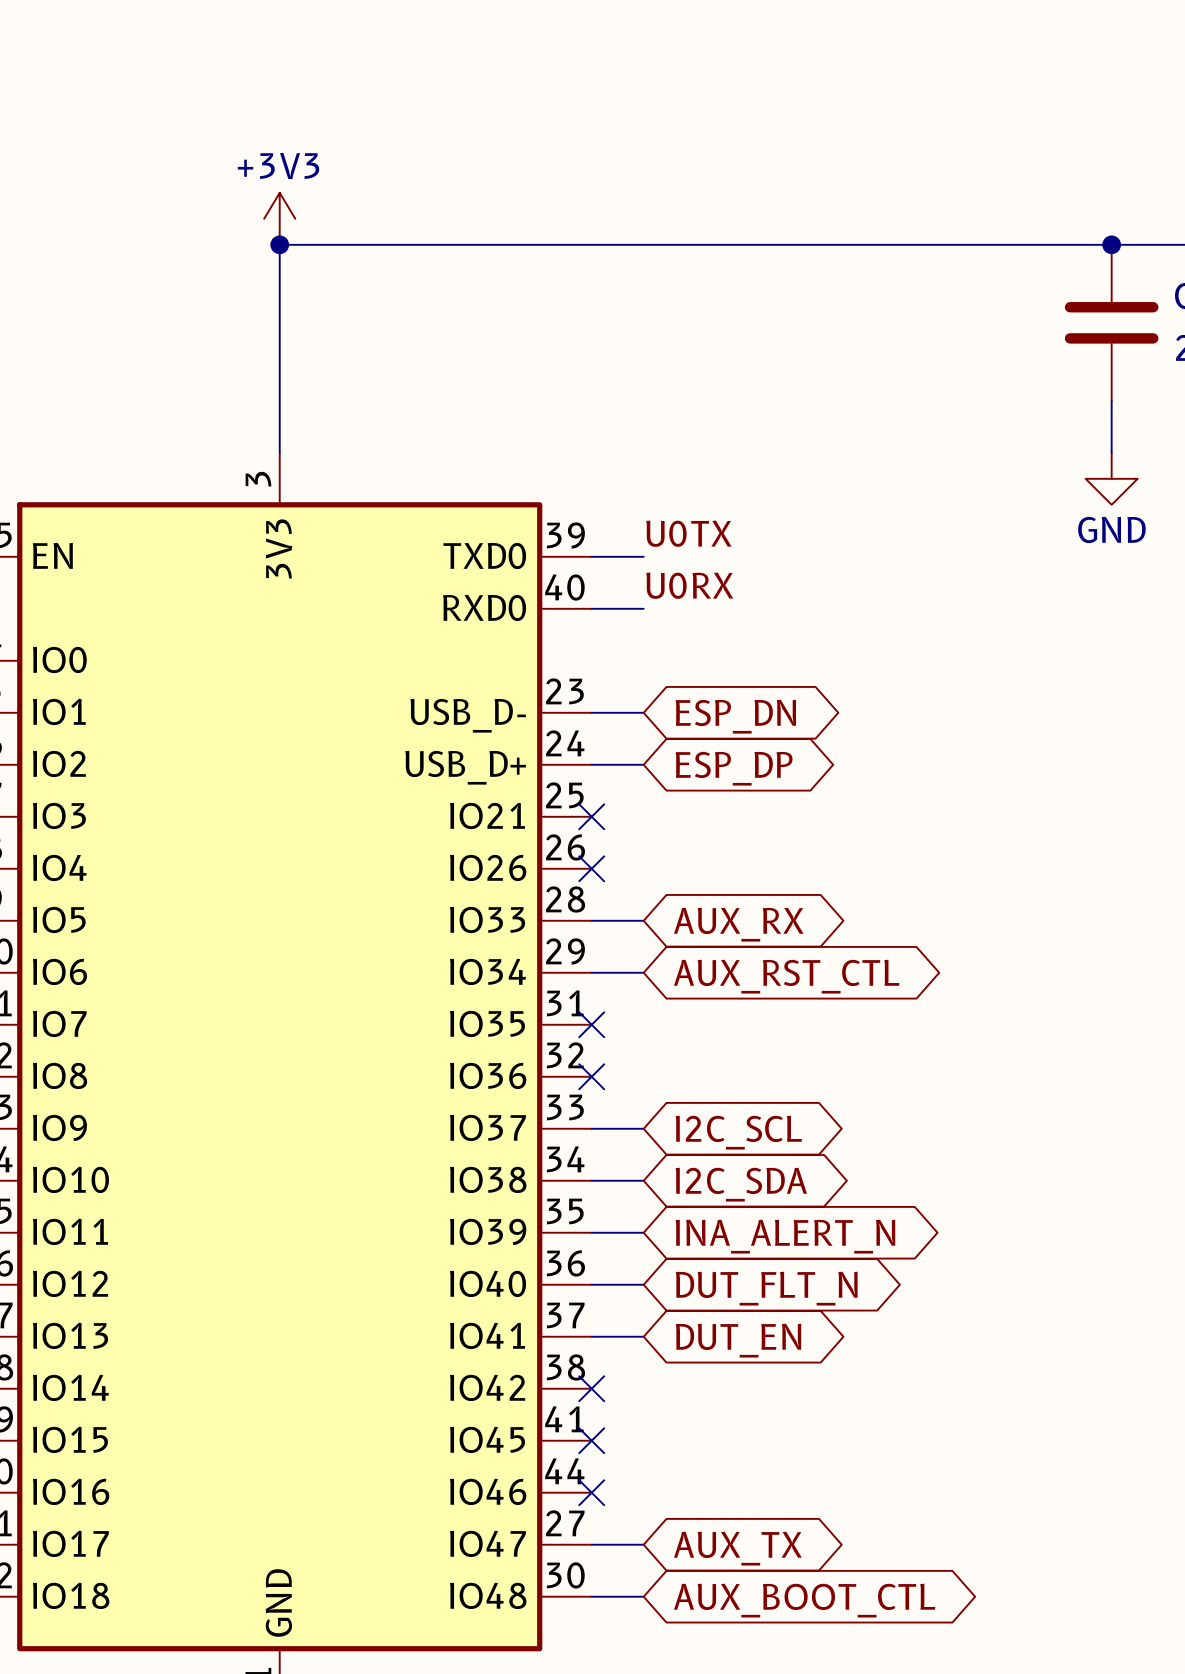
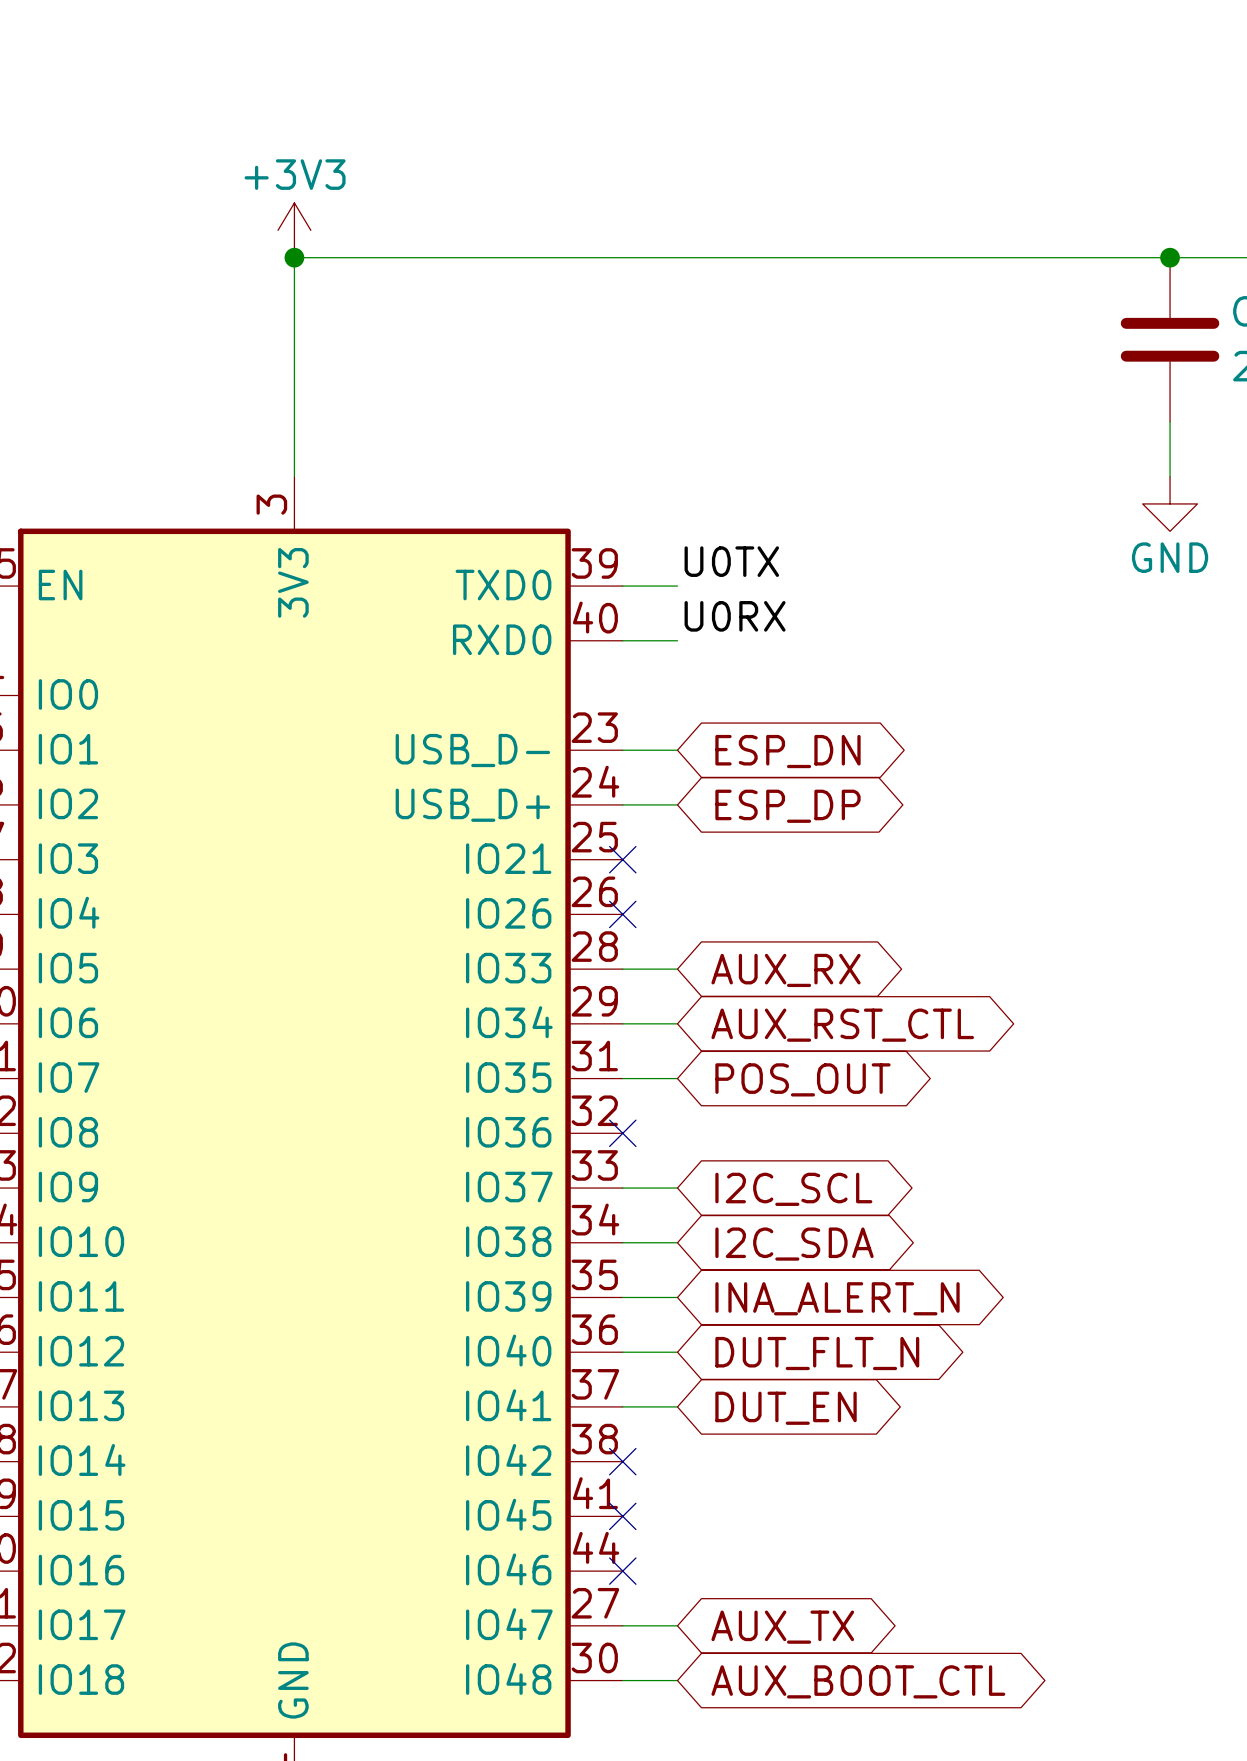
wire: none -> (622, 1078) (677, 1078)
no-connect mark: (591, 1024) -> none
global label: none -> POS_OUT (802, 1079)

